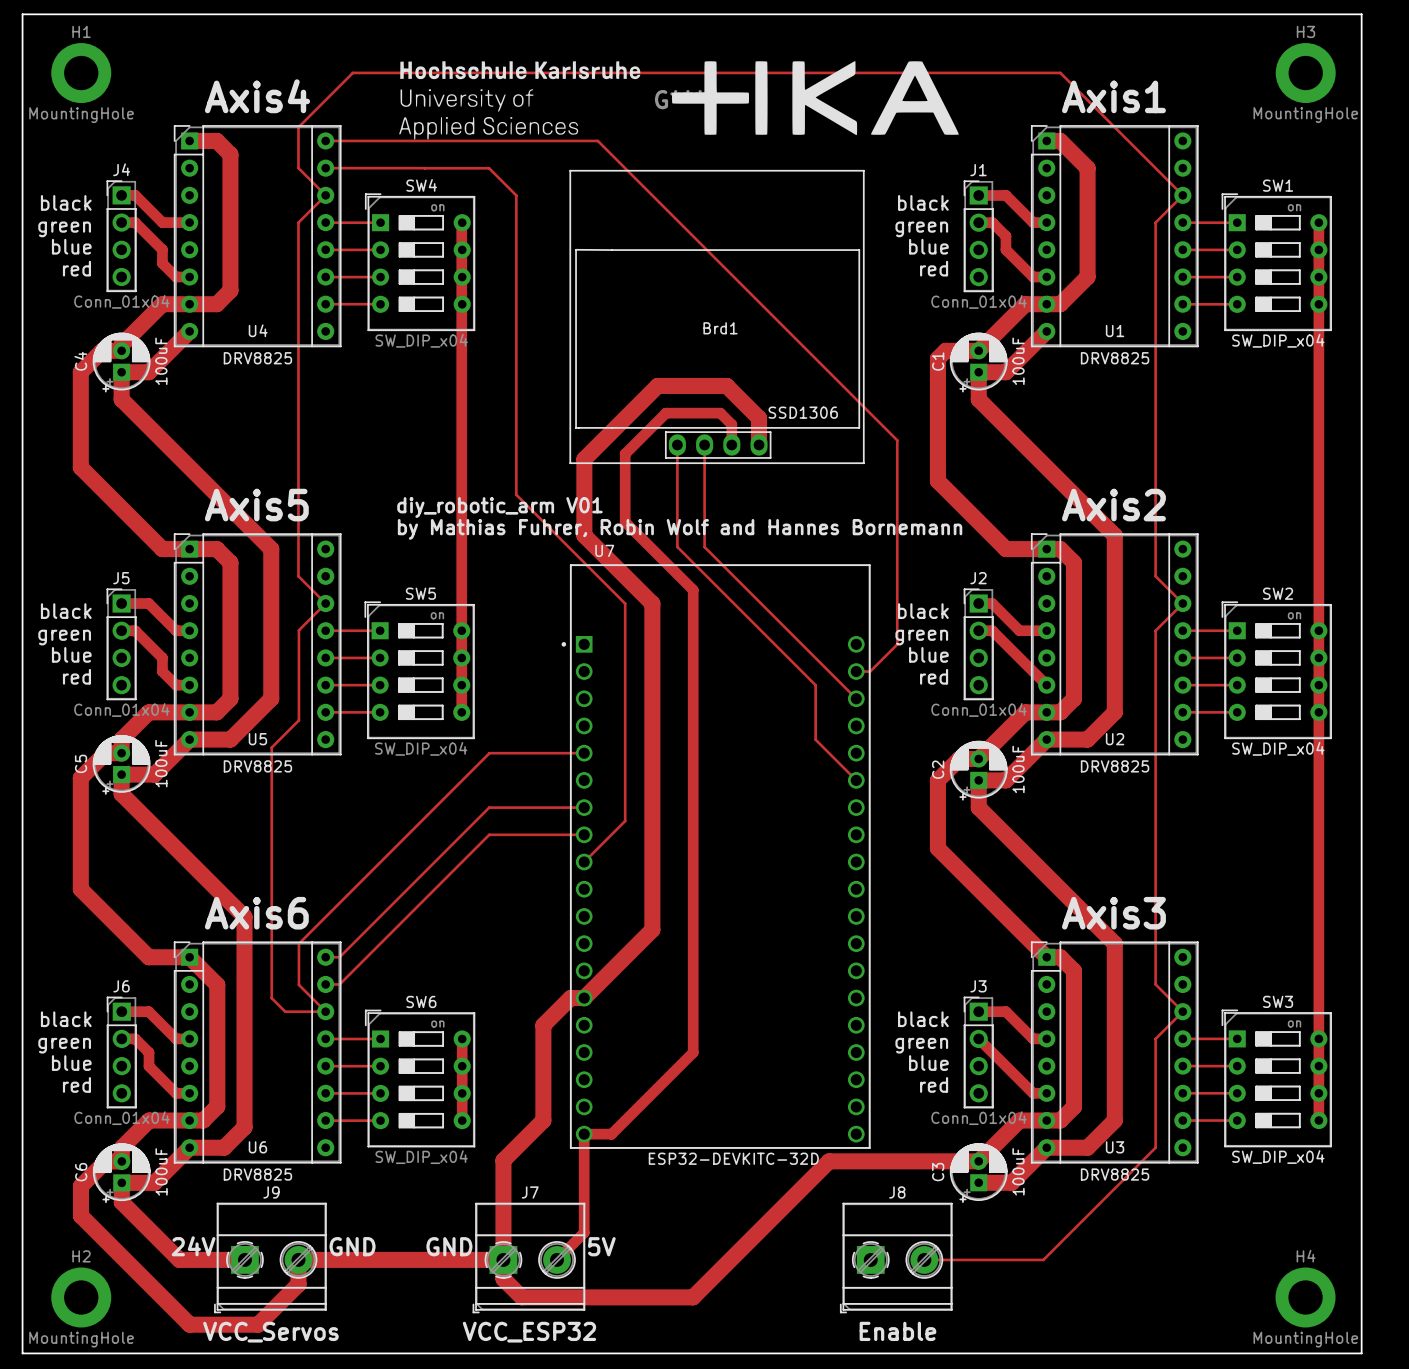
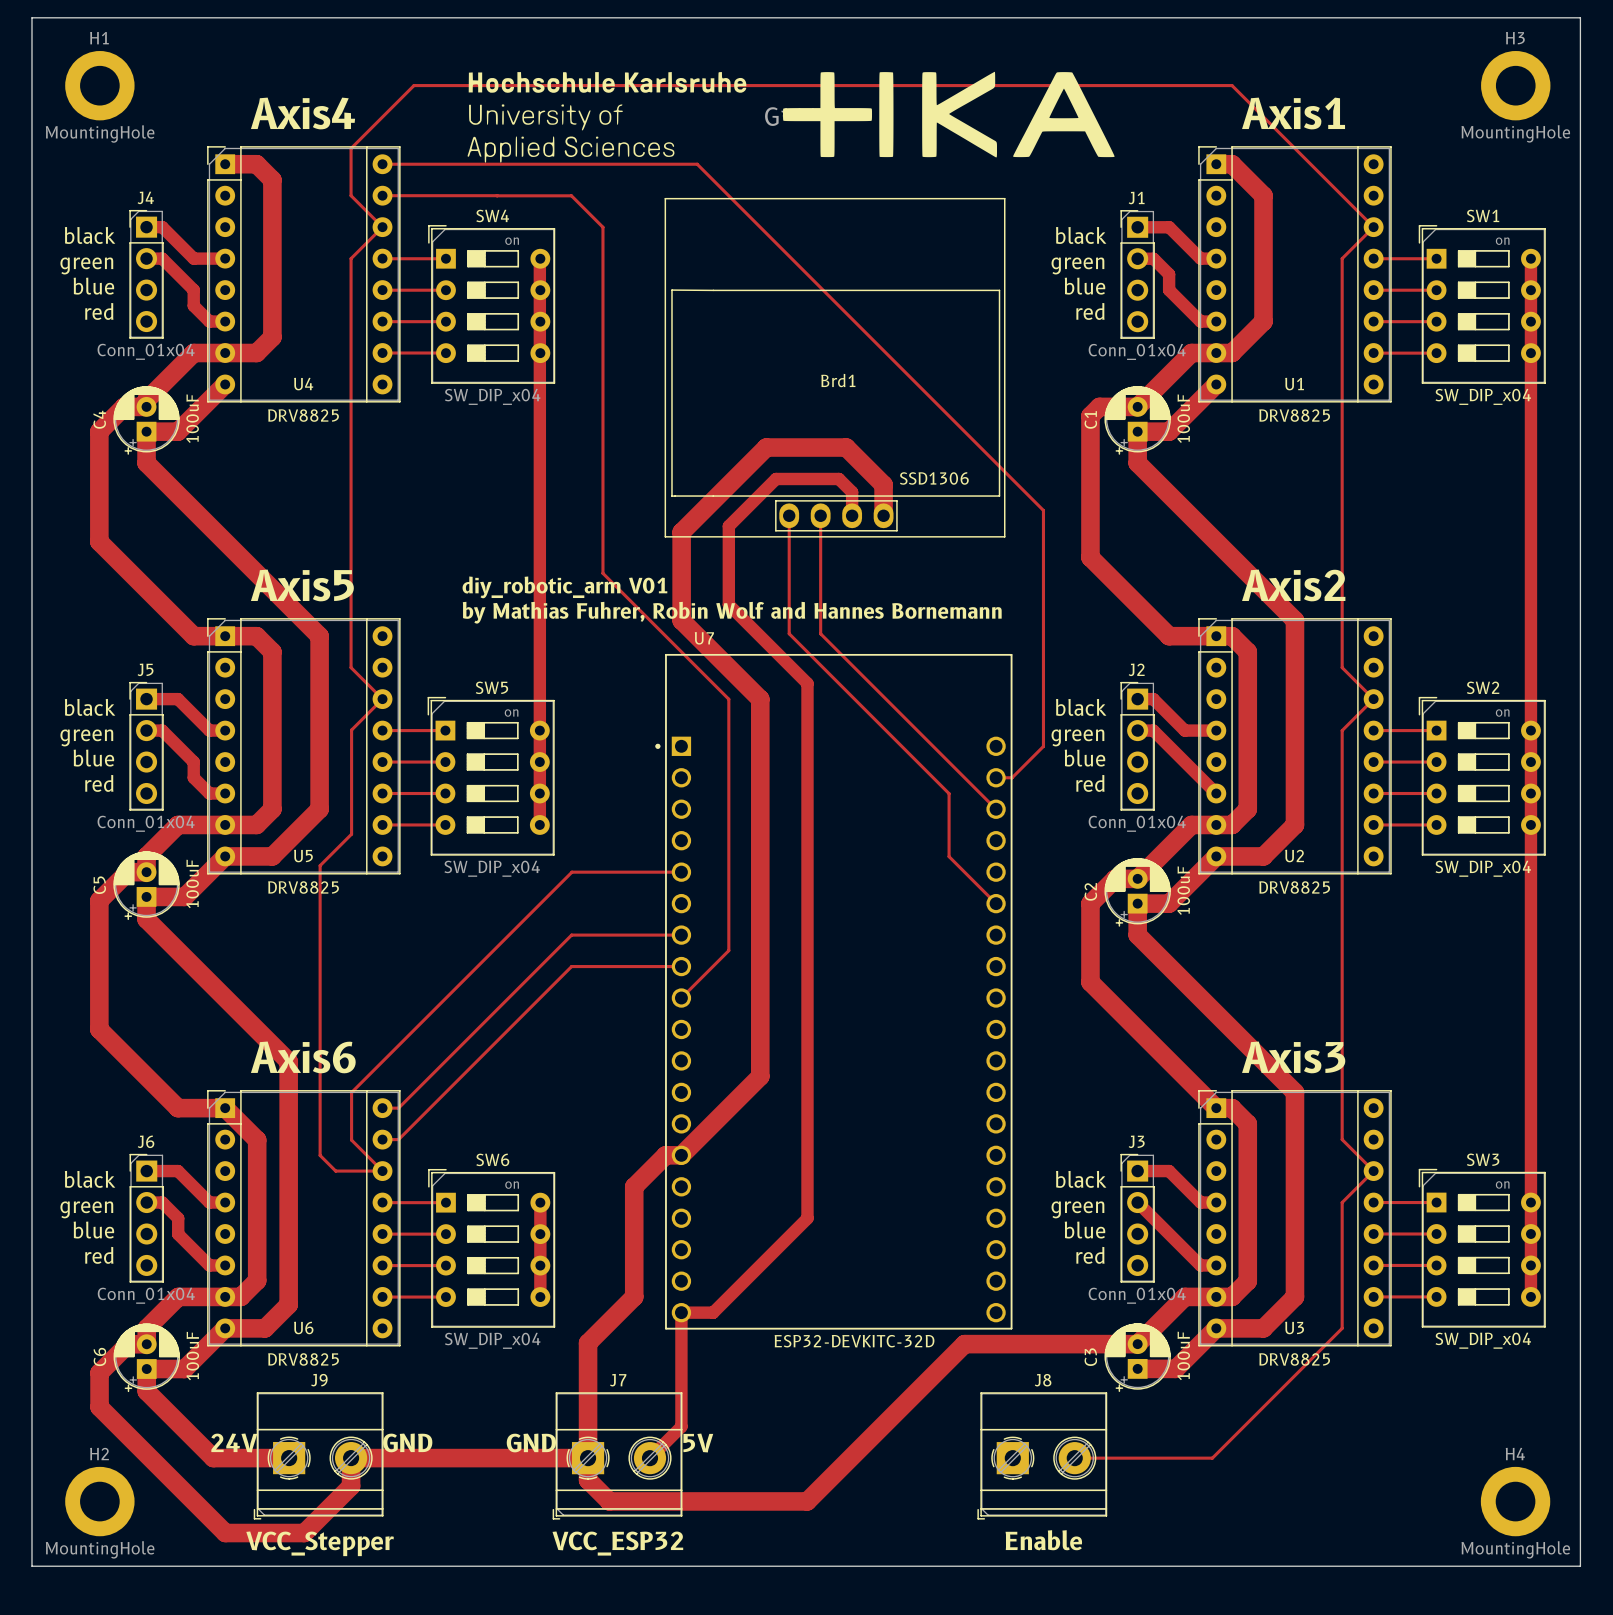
J9 value: VCC_Servos (270, 1332) -> VCC_Stepper (320, 1543)

